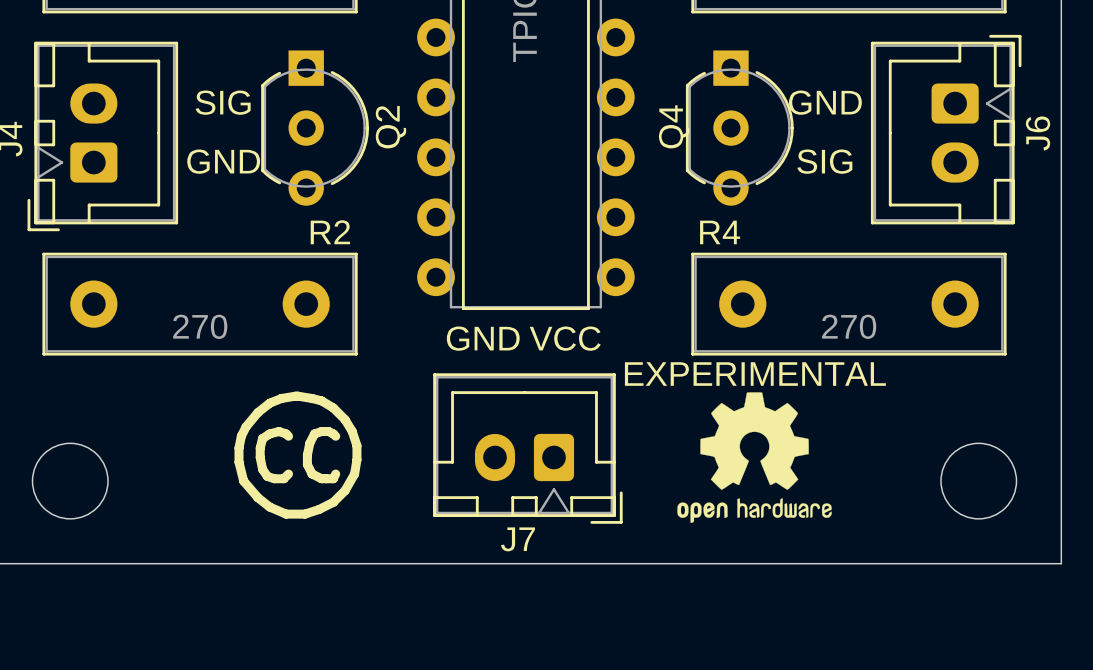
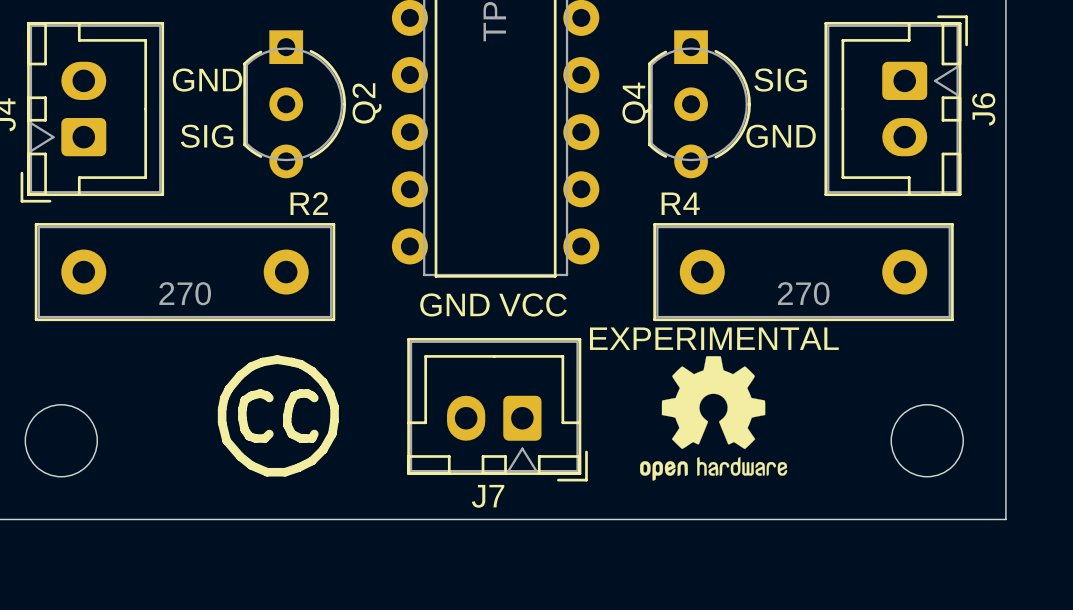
text: SIG (223, 102) -> GND (207, 80)
text: GND (825, 102) -> SIG (780, 80)
text: GND (223, 161) -> SIG (207, 136)
text: SIG (824, 161) -> GND (781, 136)

